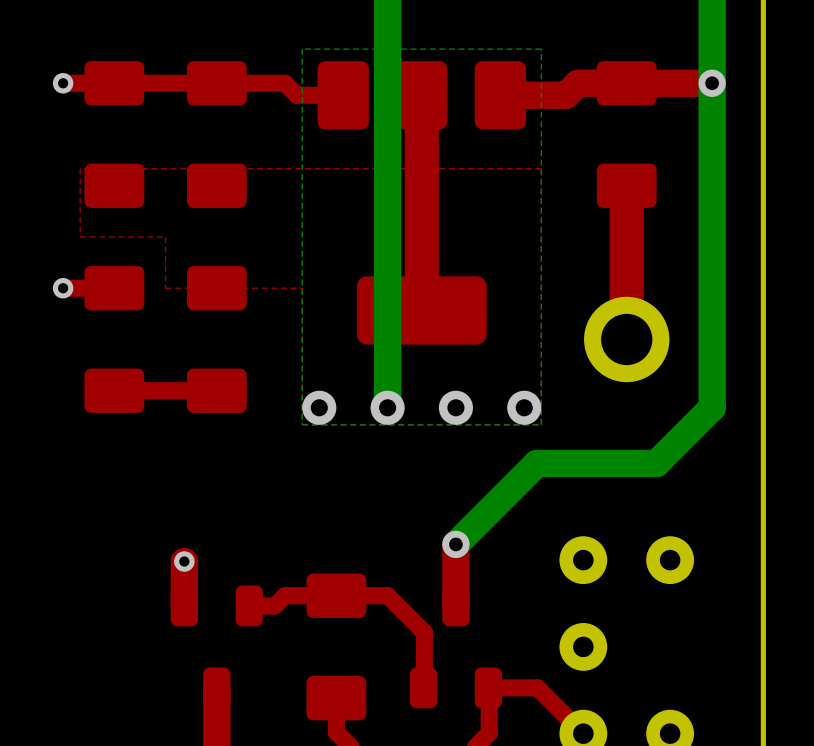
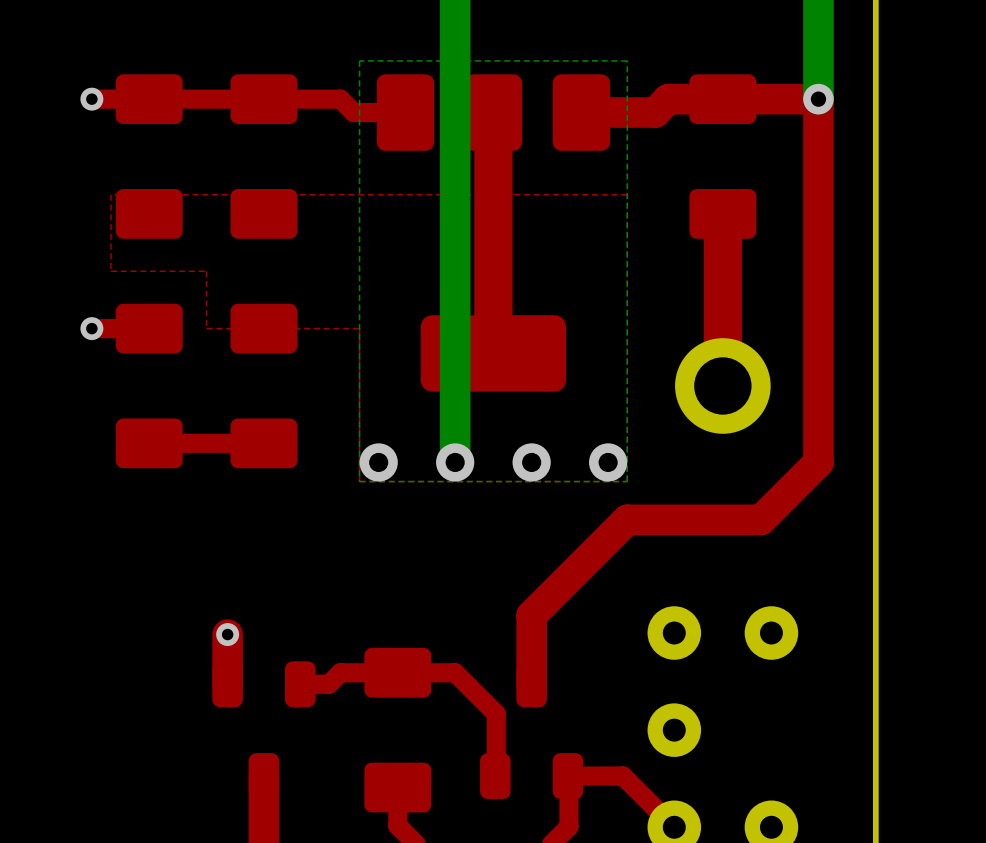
top track: none -> (818, 99) (818, 462) (761, 519) (627, 519) (531, 615)
bottom track: (712, 83) (712, 407) (656, 463) (536, 463) (455, 544) -> none
via: (455, 544) -> none

